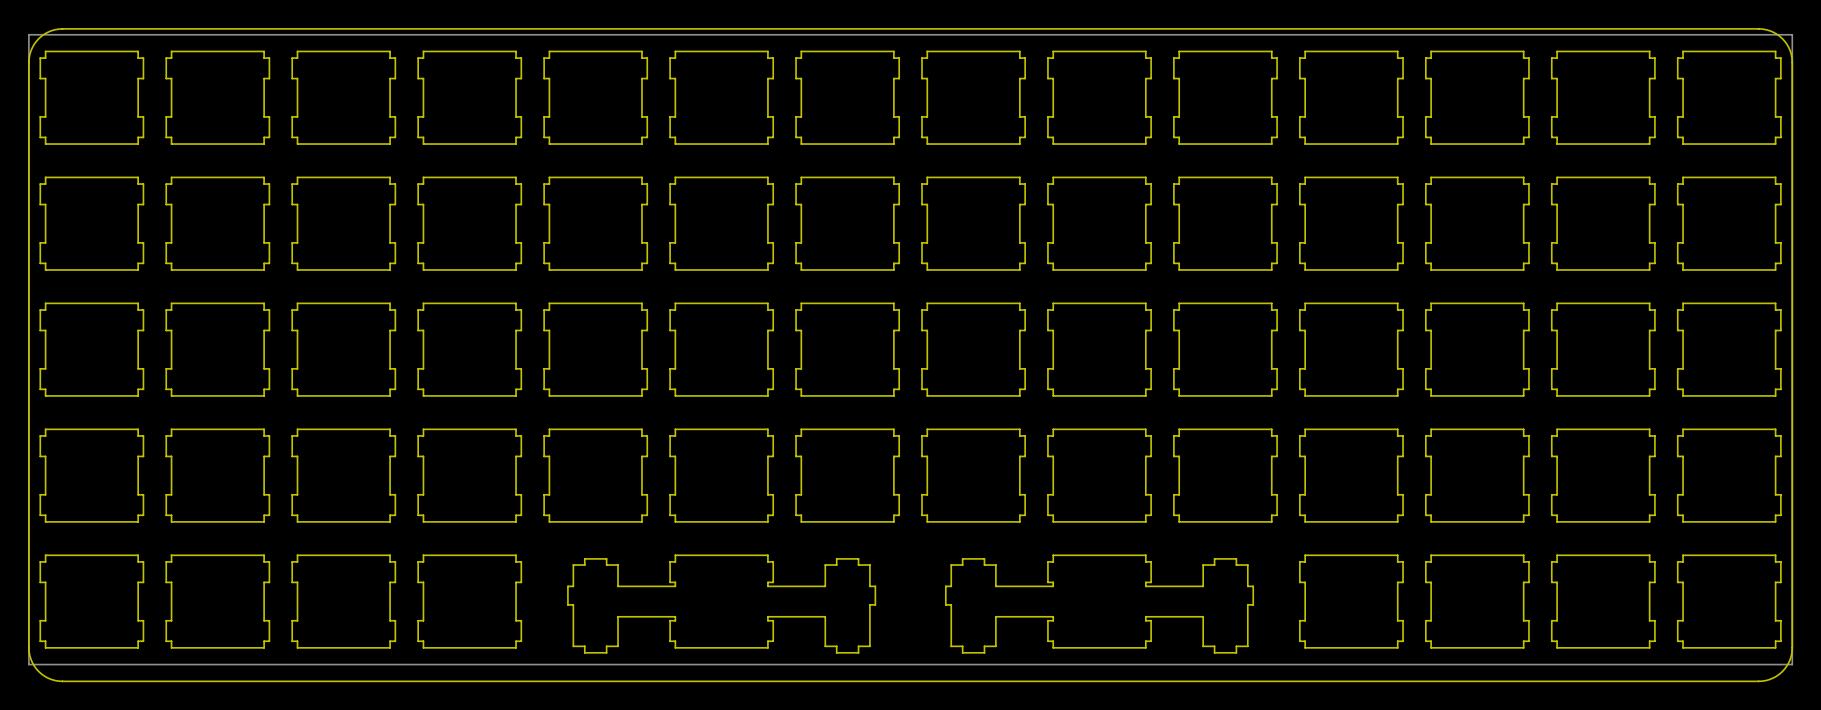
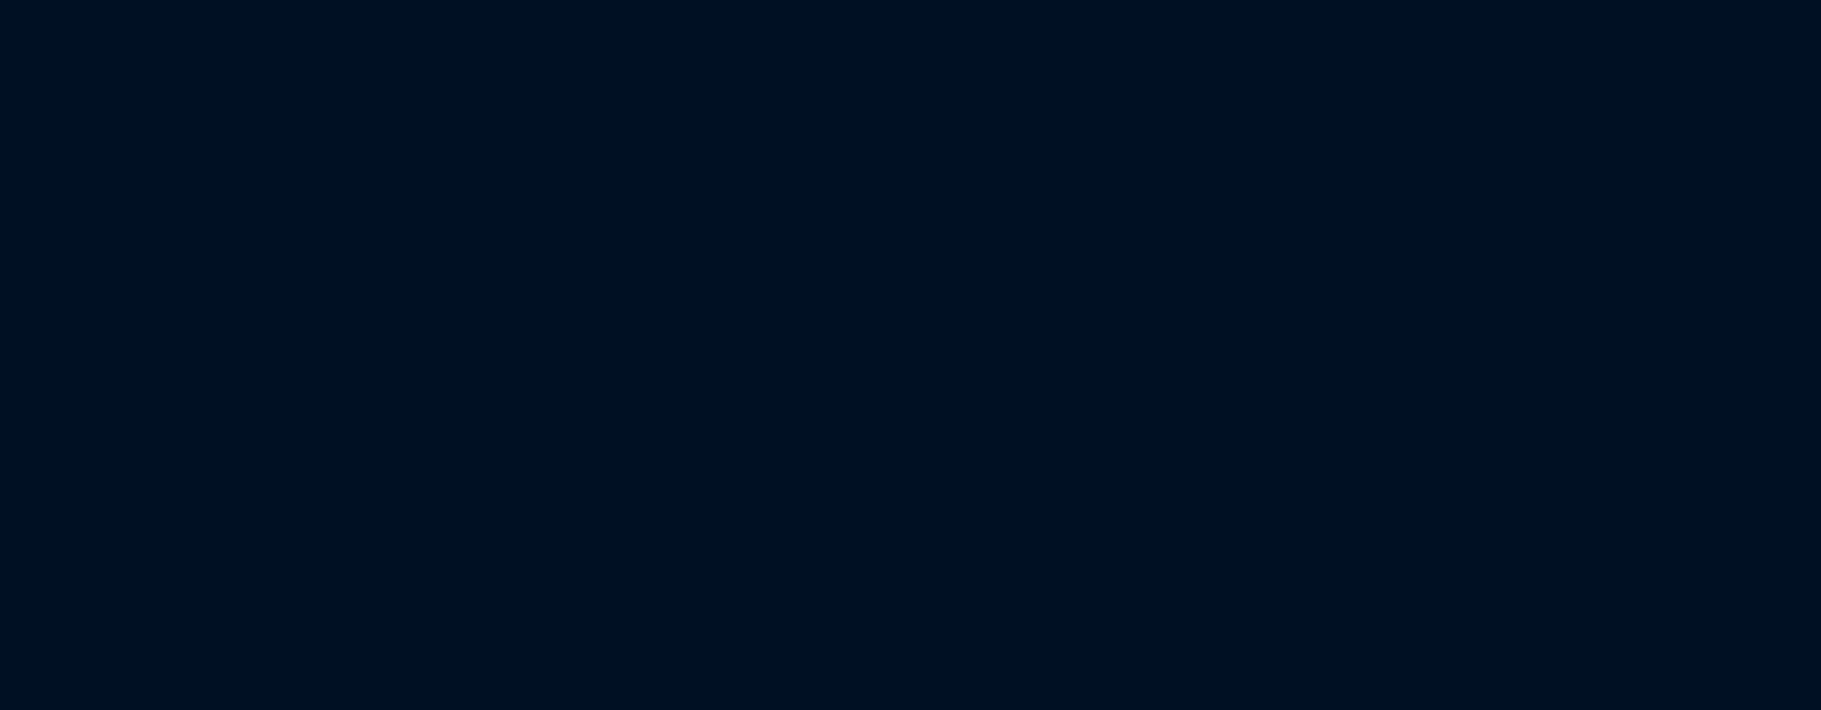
board edge: (62, 28) (1758, 28) (1769, 30) (1779, 36) (1787, 44) (1792, 62) (1792, 647) (1790, 658) (1784, 668) (1776, 676) (1758, 681) (62, 681) (51, 679) (36, 668) (30, 658) (28, 647) (28, 62) (32, 47) (38, 38) (51, 30) (62, 28) -> none
line: (28, 34) (1792, 34) (1792, 664) (28, 664) (28, 34) -> none
board edge: (45, 51) (45, 58) (40, 58) (40, 78) (45, 78) (45, 116) (40, 116) (40, 137) (45, 137) (45, 144) (138, 144) (138, 137) (143, 137) (143, 116) (138, 116) (138, 78) (143, 78) (143, 58) (138, 58) (138, 51) (45, 51) -> none
board edge: (171, 51) (171, 58) (166, 58) (166, 78) (171, 78) (171, 116) (166, 116) (166, 137) (171, 137) (171, 144) (264, 144) (264, 137) (269, 137) (269, 116) (264, 116) (264, 78) (269, 78) (269, 58) (264, 58) (264, 51) (171, 51) -> none
board edge: (297, 51) (297, 58) (292, 58) (292, 78) (297, 78) (297, 116) (292, 116) (292, 137) (297, 137) (297, 144) (390, 144) (390, 137) (395, 137) (395, 116) (390, 116) (390, 78) (395, 78) (395, 58) (390, 58) (390, 51) (297, 51) -> none
board edge: (423, 51) (516, 51) (516, 58) (521, 58) (521, 78) (516, 78) (516, 116) (521, 116) (521, 137) (516, 137) (516, 144) (423, 144) (423, 137) (418, 137) (418, 116) (423, 116) (423, 78) (418, 78) (418, 58) (423, 58) (423, 51) -> none
board edge: (549, 51) (641, 51) (641, 58) (647, 58) (647, 78) (641, 78) (641, 116) (647, 116) (647, 137) (641, 137) (641, 144) (549, 144) (549, 137) (544, 137) (544, 116) (549, 116) (549, 78) (544, 78) (544, 58) (549, 58) (549, 51) -> none
board edge: (675, 51) (767, 51) (767, 58) (773, 58) (773, 78) (767, 78) (767, 116) (773, 116) (773, 137) (767, 137) (767, 144) (675, 144) (675, 137) (670, 137) (670, 116) (675, 116) (675, 78) (670, 78) (670, 58) (675, 58) (675, 51) -> none
board edge: (801, 51) (893, 51) (893, 58) (899, 58) (899, 78) (893, 78) (893, 116) (899, 116) (899, 137) (893, 137) (893, 144) (801, 144) (801, 137) (796, 137) (796, 116) (801, 116) (801, 78) (796, 78) (796, 58) (801, 58) (801, 51) -> none
board edge: (927, 51) (927, 58) (921, 58) (921, 78) (927, 78) (927, 116) (921, 116) (921, 137) (927, 137) (927, 144) (1019, 144) (1019, 137) (1025, 137) (1025, 116) (1019, 116) (1019, 78) (1025, 78) (1025, 58) (1019, 58) (1019, 51) (927, 51) -> none
board edge: (1053, 51) (1145, 51) (1145, 58) (1151, 58) (1151, 78) (1145, 78) (1145, 116) (1151, 116) (1151, 137) (1145, 137) (1145, 144) (1053, 144) (1053, 137) (1047, 137) (1047, 116) (1053, 116) (1053, 78) (1047, 78) (1047, 58) (1053, 58) (1053, 51) -> none
board edge: (1179, 51) (1271, 51) (1271, 58) (1277, 58) (1277, 78) (1271, 78) (1271, 116) (1277, 116) (1277, 137) (1271, 137) (1271, 144) (1179, 144) (1179, 137) (1173, 137) (1173, 116) (1179, 116) (1179, 78) (1173, 78) (1173, 58) (1179, 58) (1179, 51) -> none
board edge: (1305, 51) (1305, 58) (1299, 58) (1299, 78) (1305, 78) (1305, 116) (1299, 116) (1299, 137) (1305, 137) (1305, 144) (1397, 144) (1397, 137) (1403, 137) (1403, 116) (1397, 116) (1397, 78) (1403, 78) (1403, 58) (1397, 58) (1397, 51) (1305, 51) -> none
board edge: (1431, 51) (1523, 51) (1523, 58) (1528, 58) (1528, 78) (1523, 78) (1523, 116) (1528, 116) (1528, 137) (1523, 137) (1523, 144) (1431, 144) (1431, 137) (1425, 137) (1425, 116) (1431, 116) (1431, 78) (1425, 78) (1425, 58) (1431, 58) (1431, 51) -> none
board edge: (1557, 51) (1557, 58) (1551, 58) (1551, 78) (1557, 78) (1557, 116) (1551, 116) (1551, 137) (1557, 137) (1557, 144) (1649, 144) (1649, 137) (1654, 137) (1654, 116) (1649, 116) (1649, 78) (1654, 78) (1654, 58) (1649, 58) (1649, 51) (1557, 51) -> none
board edge: (1683, 51) (1775, 51) (1775, 58) (1780, 58) (1780, 78) (1775, 78) (1775, 116) (1780, 116) (1780, 137) (1775, 137) (1775, 144) (1683, 144) (1683, 137) (1677, 137) (1677, 116) (1683, 116) (1683, 78) (1677, 78) (1677, 58) (1683, 58) (1683, 51) -> none
board edge: (45, 177) (138, 177) (138, 184) (143, 184) (143, 204) (138, 204) (138, 242) (143, 242) (143, 263) (138, 263) (138, 269) (45, 269) (45, 263) (40, 263) (40, 242) (45, 242) (45, 204) (40, 204) (40, 184) (45, 184) (45, 177) -> none
board edge: (171, 177) (171, 184) (166, 184) (166, 204) (171, 204) (171, 242) (166, 242) (166, 263) (171, 263) (171, 269) (264, 269) (264, 263) (269, 263) (269, 242) (264, 242) (264, 204) (269, 204) (269, 184) (264, 184) (264, 177) (171, 177) -> none
board edge: (297, 177) (297, 184) (292, 184) (292, 204) (297, 204) (297, 242) (292, 242) (292, 263) (297, 263) (297, 269) (390, 269) (390, 263) (395, 263) (395, 242) (390, 242) (390, 204) (395, 204) (395, 184) (390, 184) (390, 177) (297, 177) -> none
board edge: (423, 177) (516, 177) (516, 184) (521, 184) (521, 204) (516, 204) (516, 242) (521, 242) (521, 263) (516, 263) (516, 269) (423, 269) (423, 263) (418, 263) (418, 242) (423, 242) (423, 204) (418, 204) (418, 184) (423, 184) (423, 177) -> none
board edge: (549, 177) (641, 177) (641, 184) (647, 184) (647, 204) (641, 204) (641, 242) (647, 242) (647, 263) (641, 263) (641, 269) (549, 269) (549, 263) (544, 263) (544, 242) (549, 242) (549, 204) (544, 204) (544, 184) (549, 184) (549, 177) -> none
board edge: (675, 177) (767, 177) (767, 184) (773, 184) (773, 204) (767, 204) (767, 242) (773, 242) (773, 263) (767, 263) (767, 269) (675, 269) (675, 263) (670, 263) (670, 242) (675, 242) (675, 204) (670, 204) (670, 184) (675, 184) (675, 177) -> none
board edge: (801, 177) (893, 177) (893, 184) (899, 184) (899, 204) (893, 204) (893, 242) (899, 242) (899, 263) (893, 263) (893, 269) (801, 269) (801, 263) (796, 263) (796, 242) (801, 242) (801, 204) (796, 204) (796, 184) (801, 184) (801, 177) -> none
board edge: (927, 177) (1019, 177) (1019, 184) (1025, 184) (1025, 204) (1019, 204) (1019, 242) (1025, 242) (1025, 263) (1019, 263) (1019, 269) (927, 269) (927, 263) (921, 263) (921, 242) (927, 242) (927, 204) (921, 204) (921, 184) (927, 184) (927, 177) -> none
board edge: (1053, 177) (1145, 177) (1145, 184) (1151, 184) (1151, 204) (1145, 204) (1145, 242) (1151, 242) (1151, 263) (1145, 263) (1145, 269) (1053, 269) (1053, 263) (1047, 263) (1047, 242) (1053, 242) (1053, 204) (1047, 204) (1047, 184) (1053, 184) (1053, 177) -> none
board edge: (1179, 177) (1271, 177) (1271, 184) (1277, 184) (1277, 204) (1271, 204) (1271, 242) (1277, 242) (1277, 263) (1271, 263) (1271, 269) (1179, 269) (1179, 263) (1173, 263) (1173, 242) (1179, 242) (1179, 204) (1173, 204) (1173, 184) (1179, 184) (1179, 177) -> none
board edge: (1305, 177) (1305, 184) (1299, 184) (1299, 204) (1305, 204) (1305, 242) (1299, 242) (1299, 263) (1305, 263) (1305, 269) (1397, 269) (1397, 263) (1403, 263) (1403, 242) (1397, 242) (1397, 204) (1403, 204) (1403, 184) (1397, 184) (1397, 177) (1305, 177) -> none
board edge: (1431, 177) (1523, 177) (1523, 184) (1528, 184) (1528, 204) (1523, 204) (1523, 242) (1528, 242) (1528, 263) (1523, 263) (1523, 269) (1431, 269) (1431, 263) (1425, 263) (1425, 242) (1431, 242) (1431, 204) (1425, 204) (1425, 184) (1431, 184) (1431, 177) -> none
board edge: (1557, 177) (1557, 184) (1551, 184) (1551, 204) (1557, 204) (1557, 242) (1551, 242) (1551, 263) (1557, 263) (1557, 269) (1649, 269) (1649, 263) (1654, 263) (1654, 242) (1649, 242) (1649, 204) (1654, 204) (1654, 184) (1649, 184) (1649, 177) (1557, 177) -> none
board edge: (1683, 177) (1775, 177) (1775, 184) (1780, 184) (1780, 204) (1775, 204) (1775, 242) (1780, 242) (1780, 263) (1775, 263) (1775, 269) (1683, 269) (1683, 263) (1677, 263) (1677, 242) (1683, 242) (1683, 204) (1677, 204) (1677, 184) (1683, 184) (1683, 177) -> none
board edge: (45, 303) (45, 309) (40, 309) (40, 330) (45, 330) (45, 368) (40, 368) (40, 389) (45, 389) (45, 395) (138, 395) (138, 389) (143, 389) (143, 368) (138, 368) (138, 330) (143, 330) (143, 309) (138, 309) (138, 303) (45, 303) -> none
board edge: (171, 303) (171, 309) (166, 309) (166, 330) (171, 330) (171, 368) (166, 368) (166, 389) (171, 389) (171, 395) (264, 395) (264, 389) (269, 389) (269, 368) (264, 368) (264, 330) (269, 330) (269, 309) (264, 309) (264, 303) (171, 303) -> none
board edge: (297, 303) (297, 309) (292, 309) (292, 330) (297, 330) (297, 368) (292, 368) (292, 389) (297, 389) (297, 395) (390, 395) (390, 389) (395, 389) (395, 368) (390, 368) (390, 330) (395, 330) (395, 309) (390, 309) (390, 303) (297, 303) -> none
board edge: (423, 303) (516, 303) (516, 309) (521, 309) (521, 330) (516, 330) (516, 368) (521, 368) (521, 389) (516, 389) (516, 395) (423, 395) (423, 389) (418, 389) (418, 368) (423, 368) (423, 330) (418, 330) (418, 309) (423, 309) (423, 303) -> none
board edge: (549, 303) (641, 303) (641, 309) (647, 309) (647, 330) (641, 330) (641, 368) (647, 368) (647, 389) (641, 389) (641, 395) (549, 395) (549, 389) (544, 389) (544, 368) (549, 368) (549, 330) (544, 330) (544, 309) (549, 309) (549, 303) -> none
board edge: (675, 303) (675, 309) (670, 309) (670, 330) (675, 330) (675, 368) (670, 368) (670, 389) (675, 389) (675, 395) (767, 395) (767, 389) (773, 389) (773, 368) (767, 368) (767, 330) (773, 330) (773, 309) (767, 309) (767, 303) (675, 303) -> none
board edge: (801, 303) (801, 309) (796, 309) (796, 330) (801, 330) (801, 368) (796, 368) (796, 389) (801, 389) (801, 395) (893, 395) (893, 389) (899, 389) (899, 368) (893, 368) (893, 330) (899, 330) (899, 309) (893, 309) (893, 303) (801, 303) -> none
board edge: (927, 303) (927, 309) (921, 309) (921, 330) (927, 330) (927, 368) (921, 368) (921, 389) (927, 389) (927, 395) (1019, 395) (1019, 389) (1025, 389) (1025, 368) (1019, 368) (1019, 330) (1025, 330) (1025, 309) (1019, 309) (1019, 303) (927, 303) -> none
board edge: (1053, 303) (1145, 303) (1145, 309) (1151, 309) (1151, 330) (1145, 330) (1145, 368) (1151, 368) (1151, 389) (1145, 389) (1145, 395) (1053, 395) (1053, 389) (1047, 389) (1047, 368) (1053, 368) (1053, 330) (1047, 330) (1047, 309) (1053, 309) (1053, 303) -> none
board edge: (1179, 303) (1179, 309) (1173, 309) (1173, 330) (1179, 330) (1179, 368) (1173, 368) (1173, 389) (1179, 389) (1179, 395) (1271, 395) (1271, 389) (1277, 389) (1277, 368) (1271, 368) (1271, 330) (1277, 330) (1277, 309) (1271, 309) (1271, 303) (1179, 303) -> none
board edge: (1305, 303) (1305, 309) (1299, 309) (1299, 330) (1305, 330) (1305, 368) (1299, 368) (1299, 389) (1305, 389) (1305, 395) (1397, 395) (1397, 389) (1403, 389) (1403, 368) (1397, 368) (1397, 330) (1403, 330) (1403, 309) (1397, 309) (1397, 303) (1305, 303) -> none
board edge: (1431, 303) (1523, 303) (1523, 309) (1528, 309) (1528, 330) (1523, 330) (1523, 368) (1528, 368) (1528, 389) (1523, 389) (1523, 395) (1431, 395) (1431, 389) (1425, 389) (1425, 368) (1431, 368) (1431, 330) (1425, 330) (1425, 309) (1431, 309) (1431, 303) -> none
board edge: (1557, 303) (1557, 309) (1551, 309) (1551, 330) (1557, 330) (1557, 368) (1551, 368) (1551, 389) (1557, 389) (1557, 395) (1649, 395) (1649, 389) (1654, 389) (1654, 368) (1649, 368) (1649, 330) (1654, 330) (1654, 309) (1649, 309) (1649, 303) (1557, 303) -> none
board edge: (1683, 303) (1683, 309) (1677, 309) (1677, 330) (1683, 330) (1683, 368) (1677, 368) (1677, 389) (1683, 389) (1683, 395) (1775, 395) (1775, 389) (1780, 389) (1780, 368) (1775, 368) (1775, 330) (1780, 330) (1780, 309) (1775, 309) (1775, 303) (1683, 303) -> none
board edge: (45, 429) (45, 435) (40, 435) (40, 456) (45, 456) (45, 494) (40, 494) (40, 515) (45, 515) (45, 521) (138, 521) (138, 515) (143, 515) (143, 494) (138, 494) (138, 456) (143, 456) (143, 435) (138, 435) (138, 429) (45, 429) -> none
board edge: (171, 429) (171, 435) (166, 435) (166, 456) (171, 456) (171, 494) (166, 494) (166, 515) (171, 515) (171, 521) (264, 521) (264, 515) (269, 515) (269, 494) (264, 494) (264, 456) (269, 456) (269, 435) (264, 435) (264, 429) (171, 429) -> none
board edge: (297, 429) (297, 435) (292, 435) (292, 456) (297, 456) (297, 494) (292, 494) (292, 515) (297, 515) (297, 521) (390, 521) (390, 515) (395, 515) (395, 494) (390, 494) (390, 456) (395, 456) (395, 435) (390, 435) (390, 429) (297, 429) -> none
board edge: (423, 429) (516, 429) (516, 435) (521, 435) (521, 456) (516, 456) (516, 494) (521, 494) (521, 515) (516, 515) (516, 521) (423, 521) (423, 515) (418, 515) (418, 494) (423, 494) (423, 456) (418, 456) (418, 435) (423, 435) (423, 429) -> none
board edge: (549, 429) (641, 429) (641, 435) (647, 435) (647, 456) (641, 456) (641, 494) (647, 494) (647, 515) (641, 515) (641, 521) (549, 521) (549, 515) (544, 515) (544, 494) (549, 494) (549, 456) (544, 456) (544, 435) (549, 435) (549, 429) -> none
board edge: (675, 429) (767, 429) (767, 435) (773, 435) (773, 456) (767, 456) (767, 494) (773, 494) (773, 515) (767, 515) (767, 521) (675, 521) (675, 515) (670, 515) (670, 494) (675, 494) (675, 456) (670, 456) (670, 435) (675, 435) (675, 429) -> none
board edge: (801, 429) (893, 429) (893, 435) (899, 435) (899, 456) (893, 456) (893, 494) (899, 494) (899, 515) (893, 515) (893, 521) (801, 521) (801, 515) (796, 515) (796, 494) (801, 494) (801, 456) (796, 456) (796, 435) (801, 435) (801, 429) -> none
board edge: (927, 429) (927, 435) (921, 435) (921, 456) (927, 456) (927, 494) (921, 494) (921, 515) (927, 515) (927, 521) (1019, 521) (1019, 515) (1025, 515) (1025, 494) (1019, 494) (1019, 456) (1025, 456) (1025, 435) (1019, 435) (1019, 429) (927, 429) -> none
board edge: (1053, 429) (1145, 429) (1145, 435) (1151, 435) (1151, 456) (1145, 456) (1145, 494) (1151, 494) (1151, 515) (1145, 515) (1145, 521) (1053, 521) (1053, 515) (1047, 515) (1047, 494) (1053, 494) (1053, 456) (1047, 456) (1047, 435) (1053, 435) (1053, 429) -> none
board edge: (1179, 429) (1271, 429) (1271, 435) (1277, 435) (1277, 456) (1271, 456) (1271, 494) (1277, 494) (1277, 515) (1271, 515) (1271, 521) (1179, 521) (1179, 515) (1173, 515) (1173, 494) (1179, 494) (1179, 456) (1173, 456) (1173, 435) (1179, 435) (1179, 429) -> none
board edge: (1305, 429) (1305, 435) (1299, 435) (1299, 456) (1305, 456) (1305, 494) (1299, 494) (1299, 515) (1305, 515) (1305, 521) (1397, 521) (1397, 515) (1403, 515) (1403, 494) (1397, 494) (1397, 456) (1403, 456) (1403, 435) (1397, 435) (1397, 429) (1305, 429) -> none
board edge: (1431, 429) (1523, 429) (1523, 435) (1528, 435) (1528, 456) (1523, 456) (1523, 494) (1528, 494) (1528, 515) (1523, 515) (1523, 521) (1431, 521) (1431, 515) (1425, 515) (1425, 494) (1431, 494) (1431, 456) (1425, 456) (1425, 435) (1431, 435) (1431, 429) -> none
board edge: (1557, 429) (1557, 435) (1551, 435) (1551, 456) (1557, 456) (1557, 494) (1551, 494) (1551, 515) (1557, 515) (1557, 521) (1649, 521) (1649, 515) (1654, 515) (1654, 494) (1649, 494) (1649, 456) (1654, 456) (1654, 435) (1649, 435) (1649, 429) (1557, 429) -> none
board edge: (1683, 429) (1775, 429) (1775, 435) (1780, 435) (1780, 456) (1775, 456) (1775, 494) (1780, 494) (1780, 515) (1775, 515) (1775, 521) (1683, 521) (1683, 515) (1677, 515) (1677, 494) (1683, 494) (1683, 456) (1677, 456) (1677, 435) (1683, 435) (1683, 429) -> none
board edge: (45, 555) (45, 561) (40, 561) (40, 582) (45, 582) (45, 620) (40, 620) (40, 641) (45, 641) (45, 647) (138, 647) (138, 641) (143, 641) (143, 620) (138, 620) (138, 582) (143, 582) (143, 561) (138, 561) (138, 555) (45, 555) -> none
board edge: (171, 555) (171, 561) (166, 561) (166, 582) (171, 582) (171, 620) (166, 620) (166, 641) (171, 641) (171, 647) (264, 647) (264, 641) (269, 641) (269, 620) (264, 620) (264, 582) (269, 582) (269, 561) (264, 561) (264, 555) (171, 555) -> none
board edge: (297, 555) (297, 561) (292, 561) (292, 582) (297, 582) (297, 620) (292, 620) (292, 641) (297, 641) (297, 647) (390, 647) (390, 641) (395, 641) (395, 620) (390, 620) (390, 582) (395, 582) (395, 561) (390, 561) (390, 555) (297, 555) -> none
board edge: (423, 555) (516, 555) (516, 561) (521, 561) (521, 582) (516, 582) (516, 620) (521, 620) (521, 641) (516, 641) (516, 647) (423, 647) (423, 641) (418, 641) (418, 620) (423, 620) (423, 582) (418, 582) (418, 561) (423, 561) (423, 555) -> none
board edge: (675, 555) (767, 555) (767, 561) (773, 561) (773, 582) (767, 582) (767, 586) (825, 586) (825, 565) (836, 565) (836, 558) (858, 558) (858, 565) (869, 565) (869, 586) (875, 586) (875, 604) (869, 604) (869, 646) (858, 646) (858, 652) (836, 652) (836, 646) (825, 646) (825, 616) (767, 616) (767, 620) (773, 620) (773, 641) (767, 641) (767, 647) (675, 647) (675, 641) (670, 641) (670, 620) (675, 620) (675, 616) (618, 616) (618, 646) (606, 646) (606, 652) (584, 652) (584, 646) (573, 646) (573, 604) (567, 604) (567, 586) (573, 586) (573, 565) (584, 565) (584, 558) (606, 558) (606, 565) (618, 565) (618, 586) (675, 586) (675, 582) (670, 582) (670, 561) (675, 561) (675, 555) -> none
board edge: (1053, 555) (1145, 555) (1145, 561) (1151, 561) (1151, 582) (1145, 582) (1145, 586) (1203, 586) (1203, 565) (1214, 565) (1214, 558) (1236, 558) (1236, 565) (1247, 565) (1247, 586) (1253, 586) (1253, 604) (1247, 604) (1247, 646) (1236, 646) (1236, 652) (1214, 652) (1214, 646) (1203, 646) (1203, 616) (1145, 616) (1145, 620) (1151, 620) (1151, 641) (1145, 641) (1145, 647) (1053, 647) (1053, 641) (1047, 641) (1047, 620) (1053, 620) (1053, 616) (995, 616) (995, 646) (984, 646) (984, 652) (962, 652) (962, 646) (951, 646) (951, 604) (945, 604) (945, 586) (951, 586) (951, 565) (962, 565) (962, 558) (984, 558) (984, 565) (995, 565) (995, 586) (1053, 586) (1053, 582) (1047, 582) (1047, 561) (1053, 561) (1053, 555) -> none
board edge: (1305, 555) (1305, 561) (1299, 561) (1299, 582) (1305, 582) (1305, 620) (1299, 620) (1299, 641) (1305, 641) (1305, 647) (1397, 647) (1397, 641) (1403, 641) (1403, 620) (1397, 620) (1397, 582) (1403, 582) (1403, 561) (1397, 561) (1397, 555) (1305, 555) -> none
board edge: (1431, 555) (1523, 555) (1523, 561) (1528, 561) (1528, 582) (1523, 582) (1523, 620) (1528, 620) (1528, 641) (1523, 641) (1523, 647) (1431, 647) (1431, 641) (1425, 641) (1425, 620) (1431, 620) (1431, 582) (1425, 582) (1425, 561) (1431, 561) (1431, 555) -> none
board edge: (1557, 555) (1557, 561) (1551, 561) (1551, 582) (1557, 582) (1557, 620) (1551, 620) (1551, 641) (1557, 641) (1557, 647) (1649, 647) (1649, 641) (1654, 641) (1654, 620) (1649, 620) (1649, 582) (1654, 582) (1654, 561) (1649, 561) (1649, 555) (1557, 555) -> none
board edge: (1683, 555) (1775, 555) (1775, 561) (1780, 561) (1780, 582) (1775, 582) (1775, 620) (1780, 620) (1780, 641) (1775, 641) (1775, 647) (1683, 647) (1683, 641) (1677, 641) (1677, 620) (1683, 620) (1683, 582) (1677, 582) (1677, 561) (1683, 561) (1683, 555) -> none

